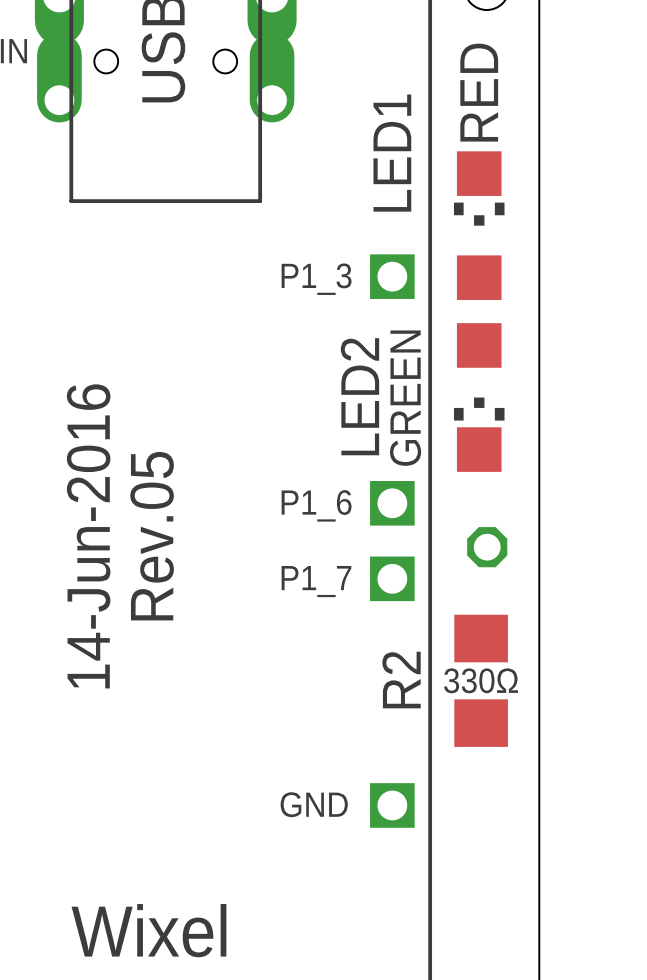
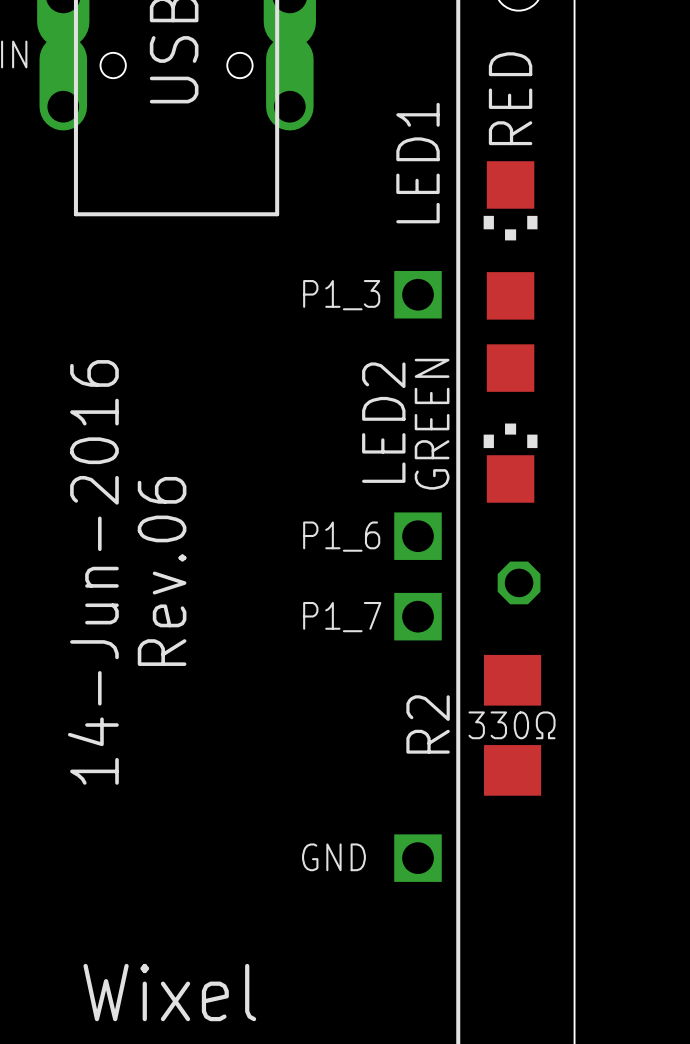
text: Rev.05 (152, 536) -> Rev.06 (162, 571)

